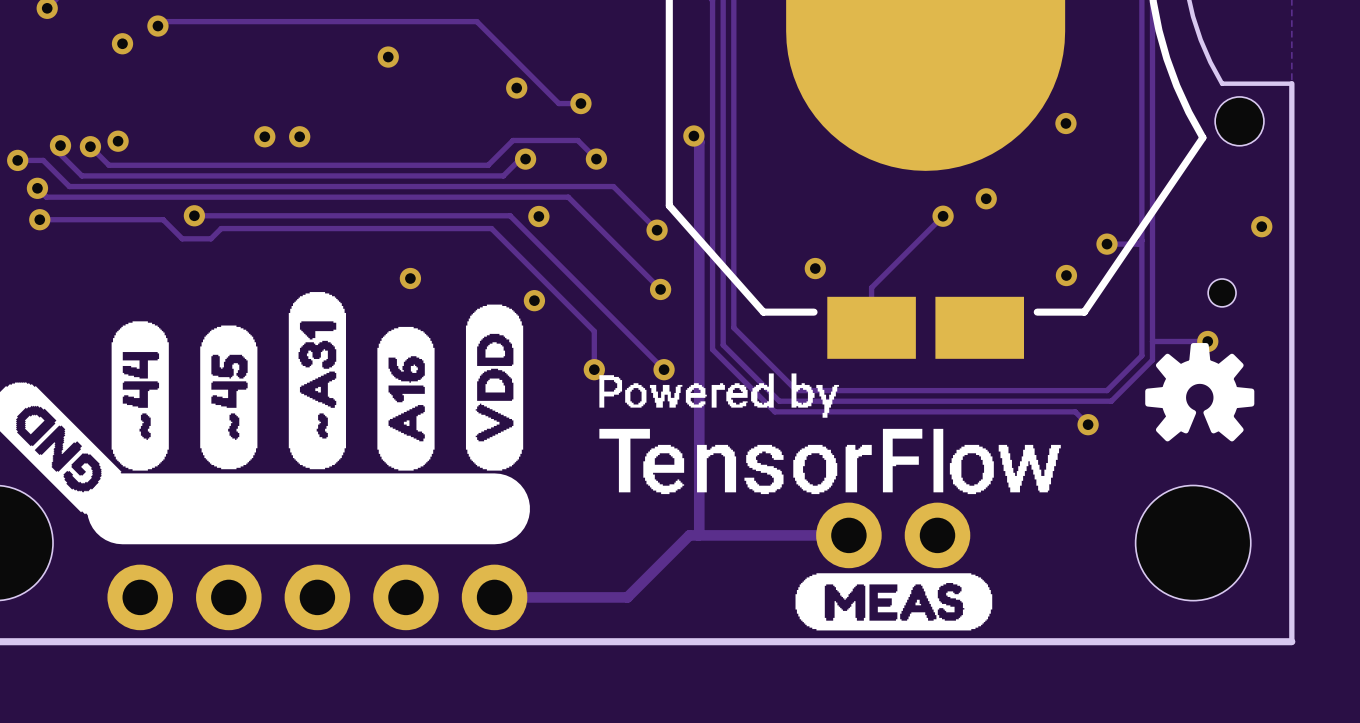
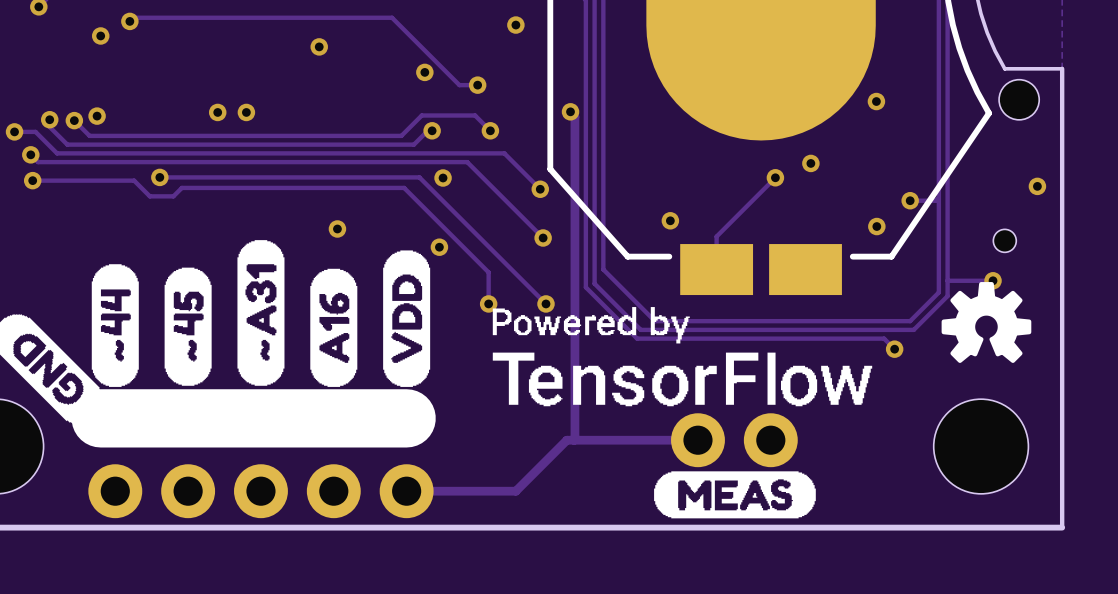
via: none -> (515, 25)

